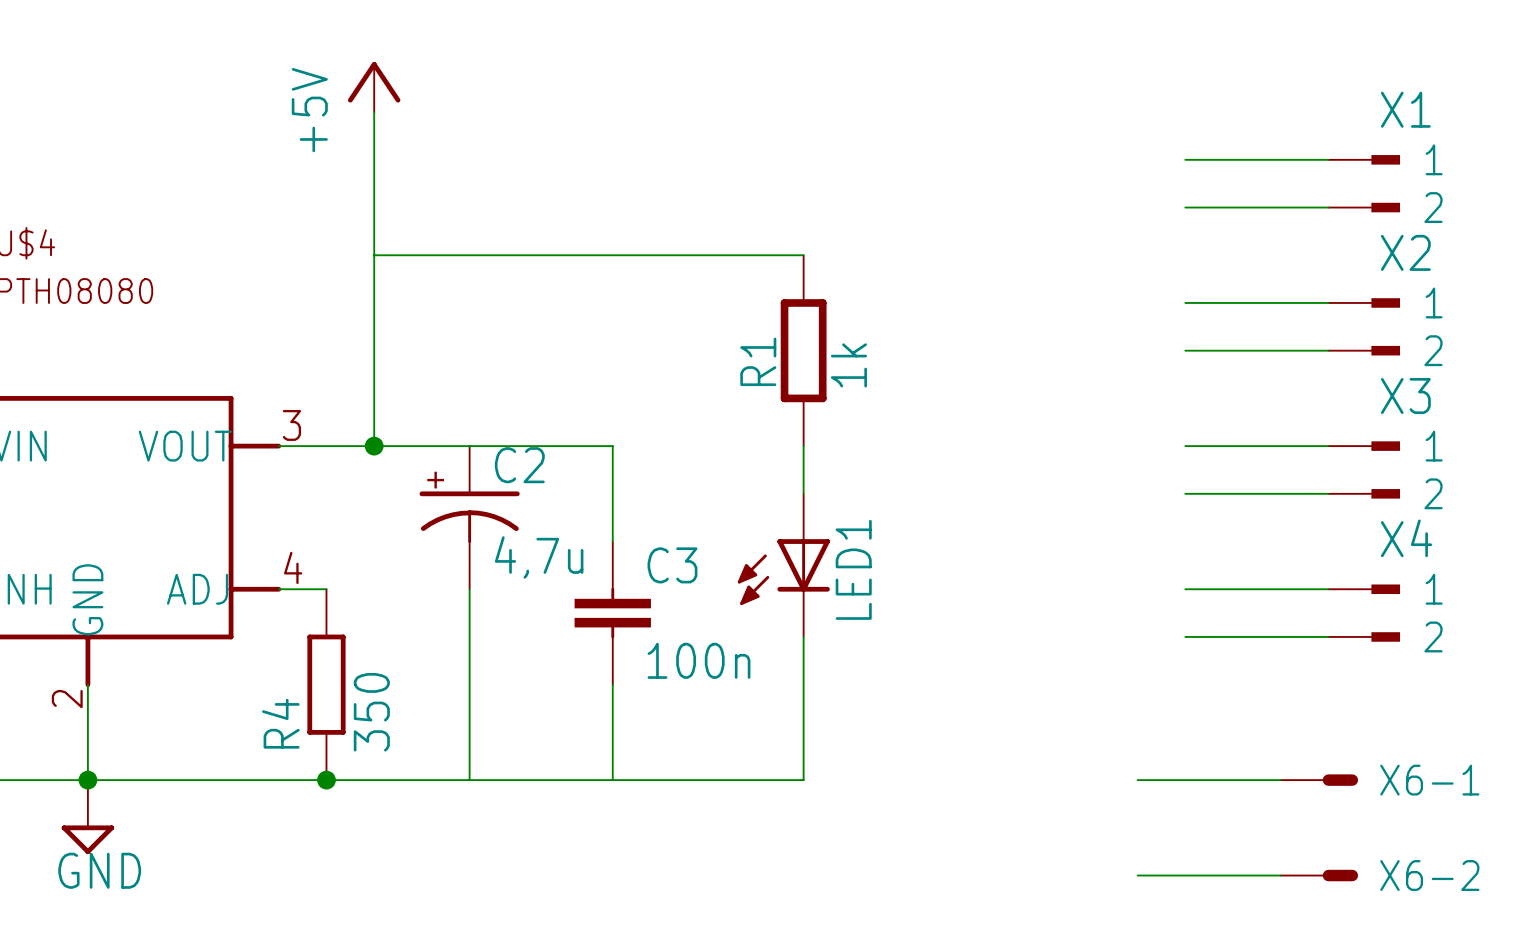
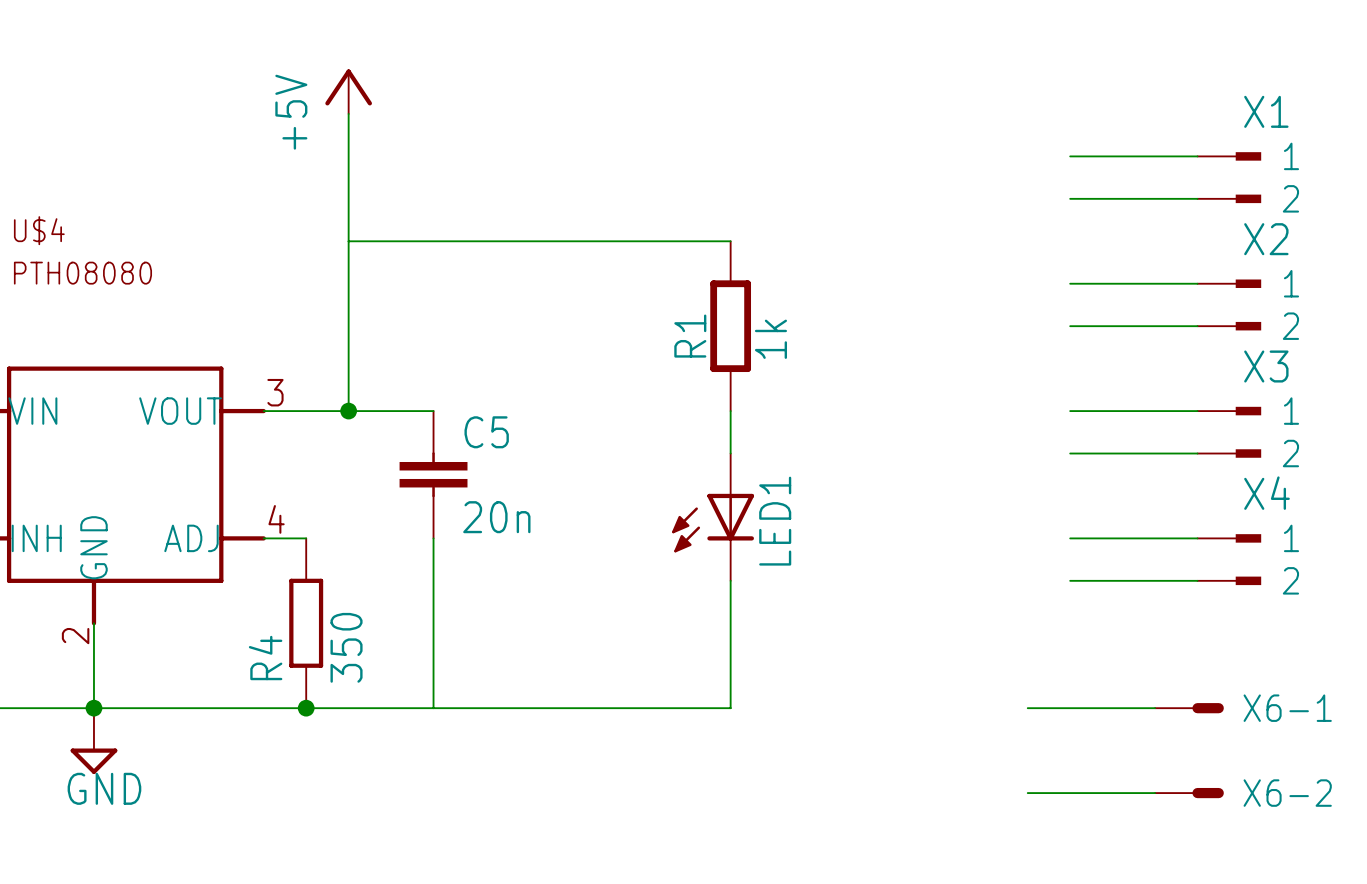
wire: (469, 446) (612, 446) (612, 541) -> none
C2: 4,7u (469, 517) -> none
C5: none -> 20n (433, 474)
C3: 100n (612, 613) -> none
wire: (612, 684) (612, 780) -> none

